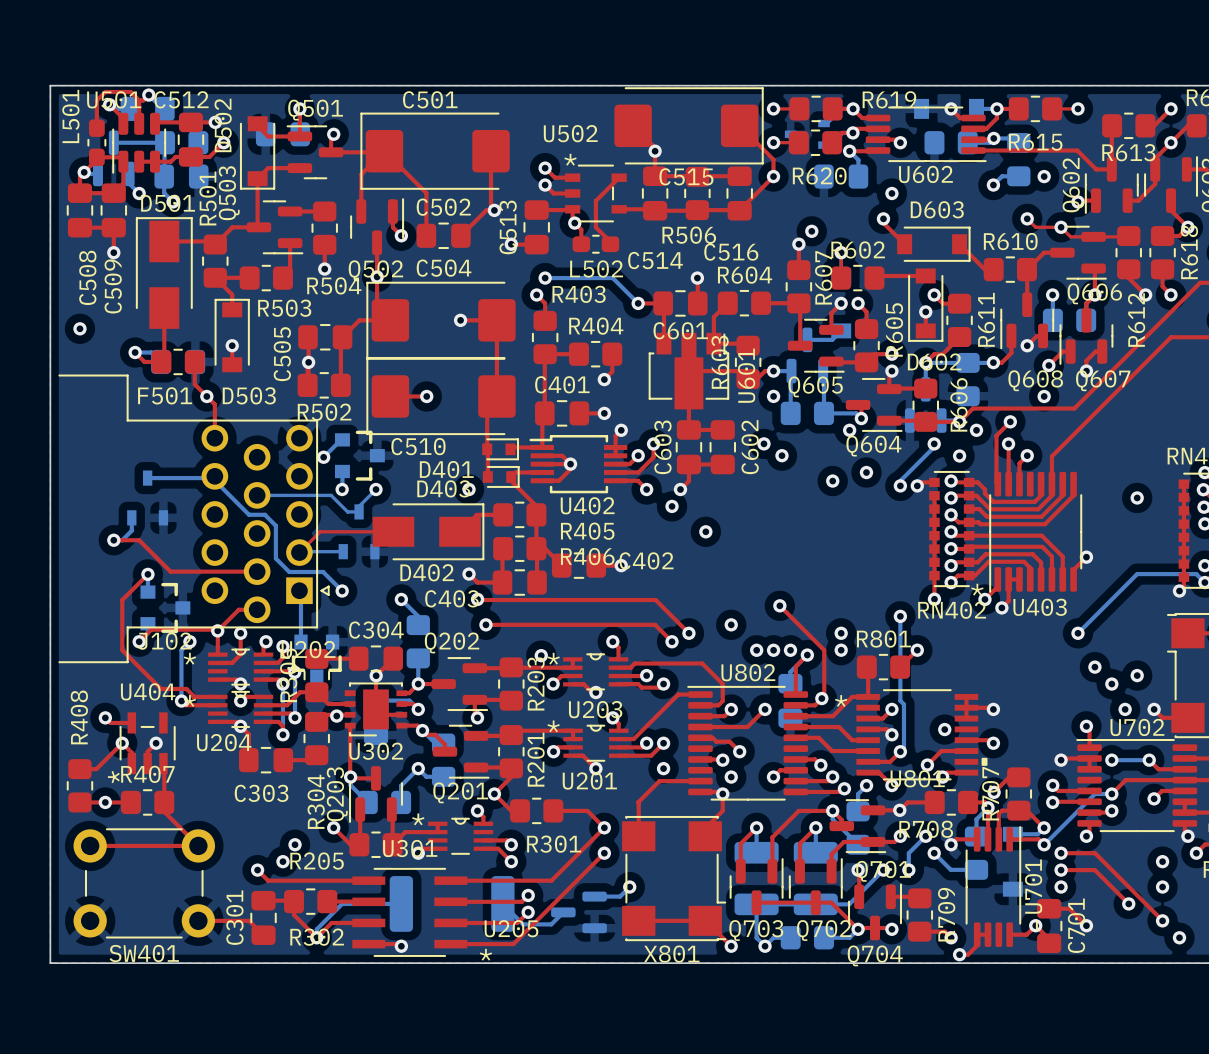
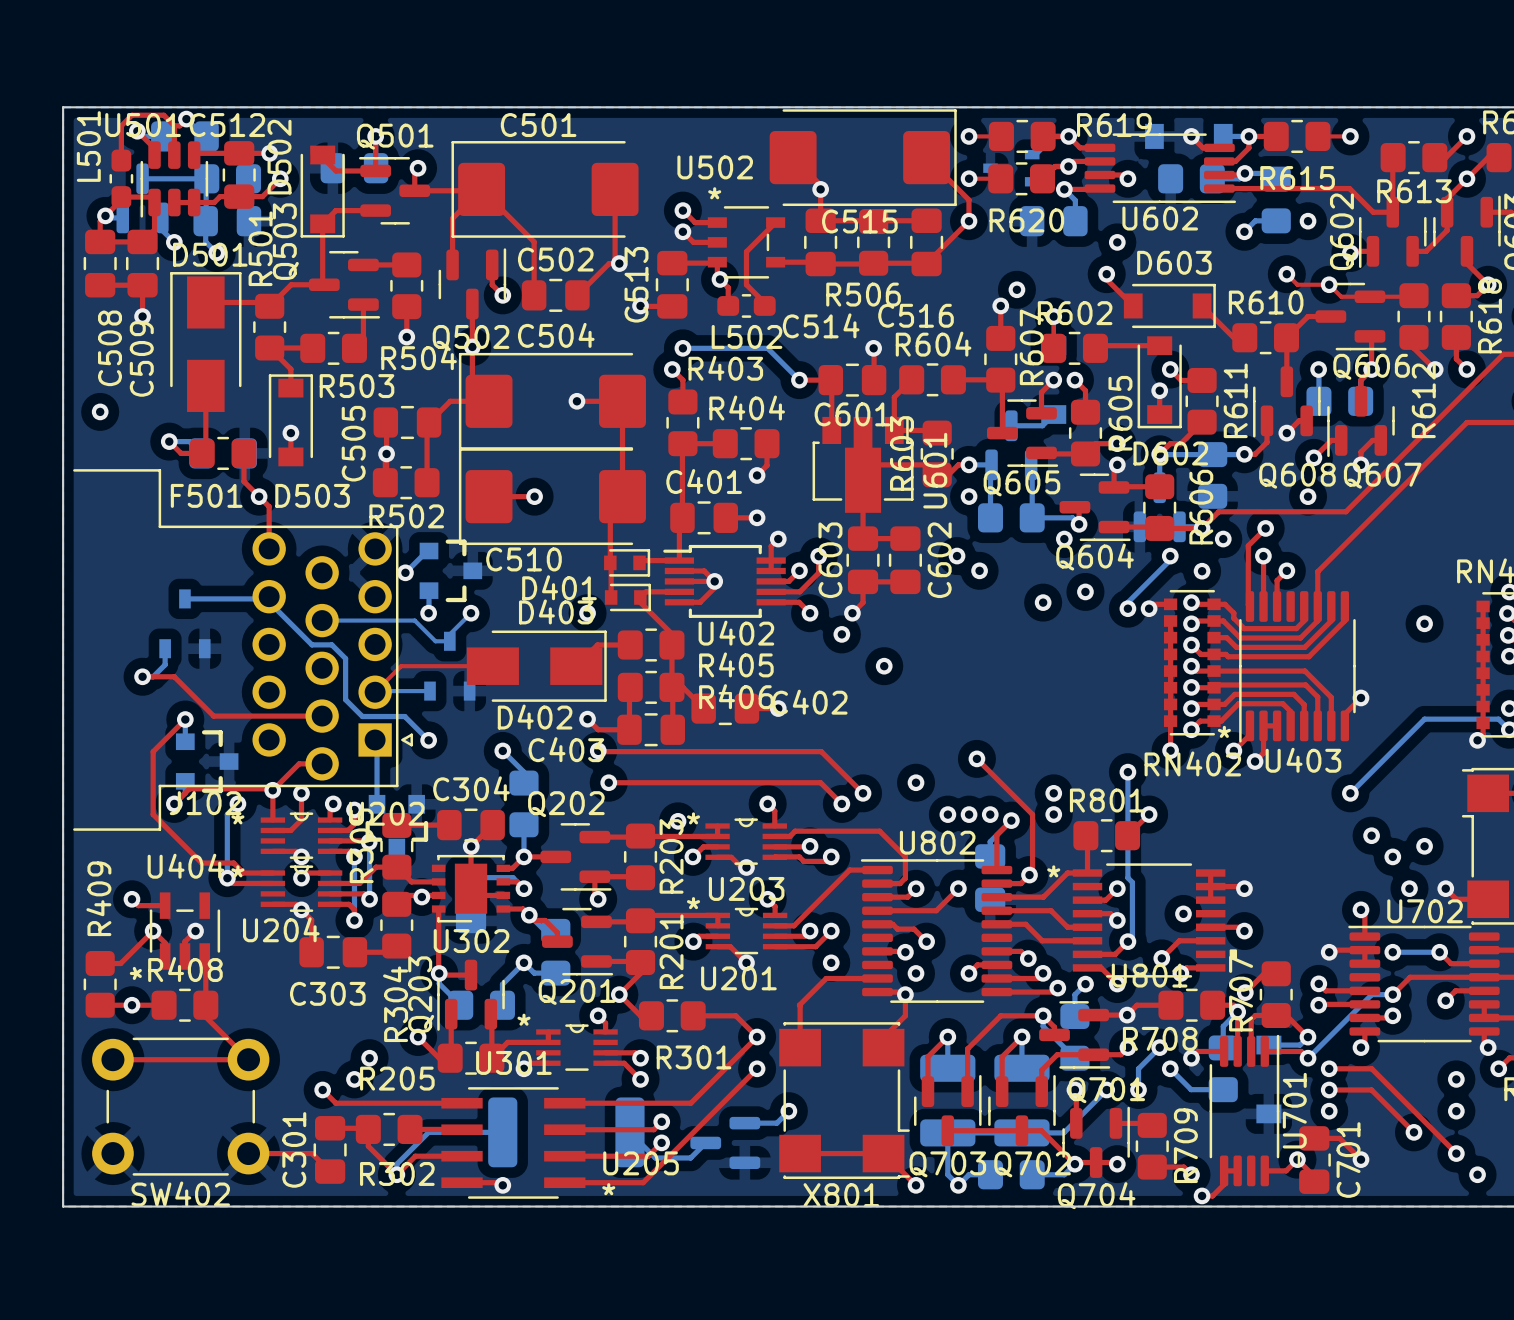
R408 name: R408 (79, 717) -> R409 (98, 898)
R407 name: R407 (147, 774) -> R408 (185, 969)
SW401 name: SW401 (144, 953) -> SW402 (180, 1193)

